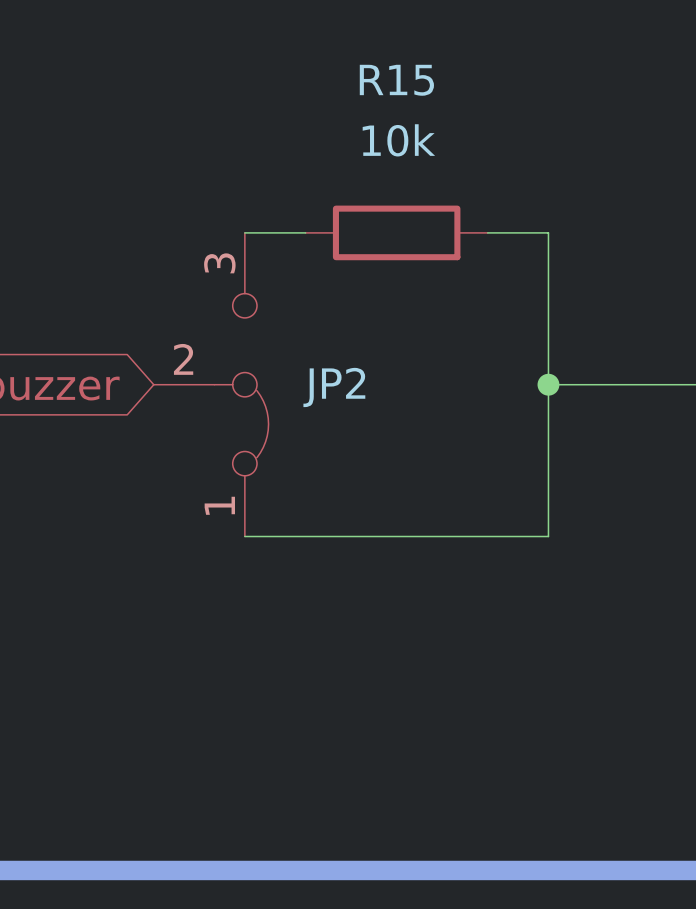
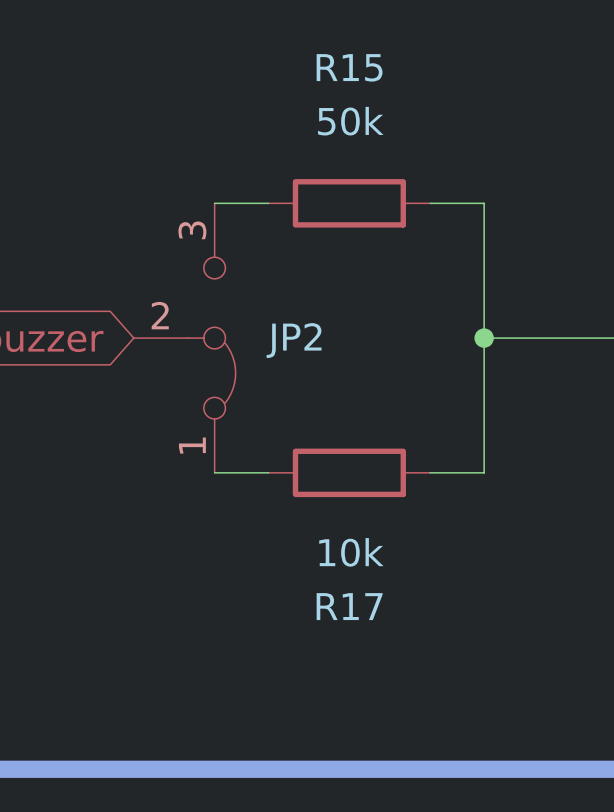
R15 value: 10k (398, 140) -> 50k (350, 121)
wire: (305, 536) (487, 536) -> none
R17: none -> 10k (349, 472)

